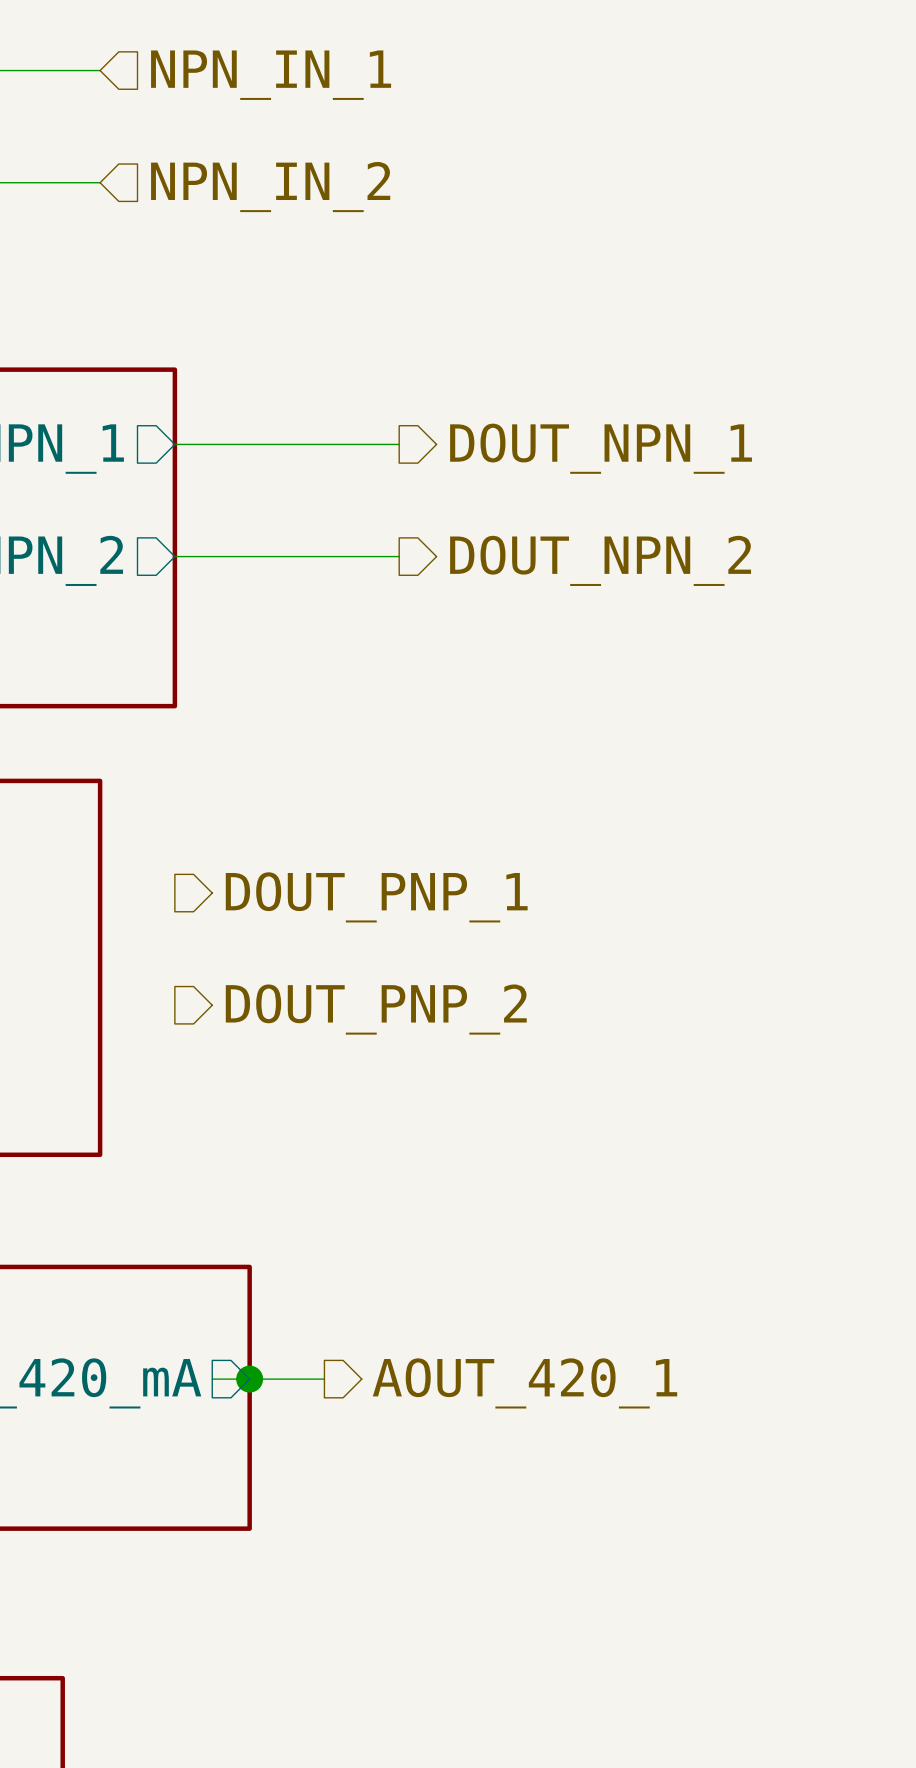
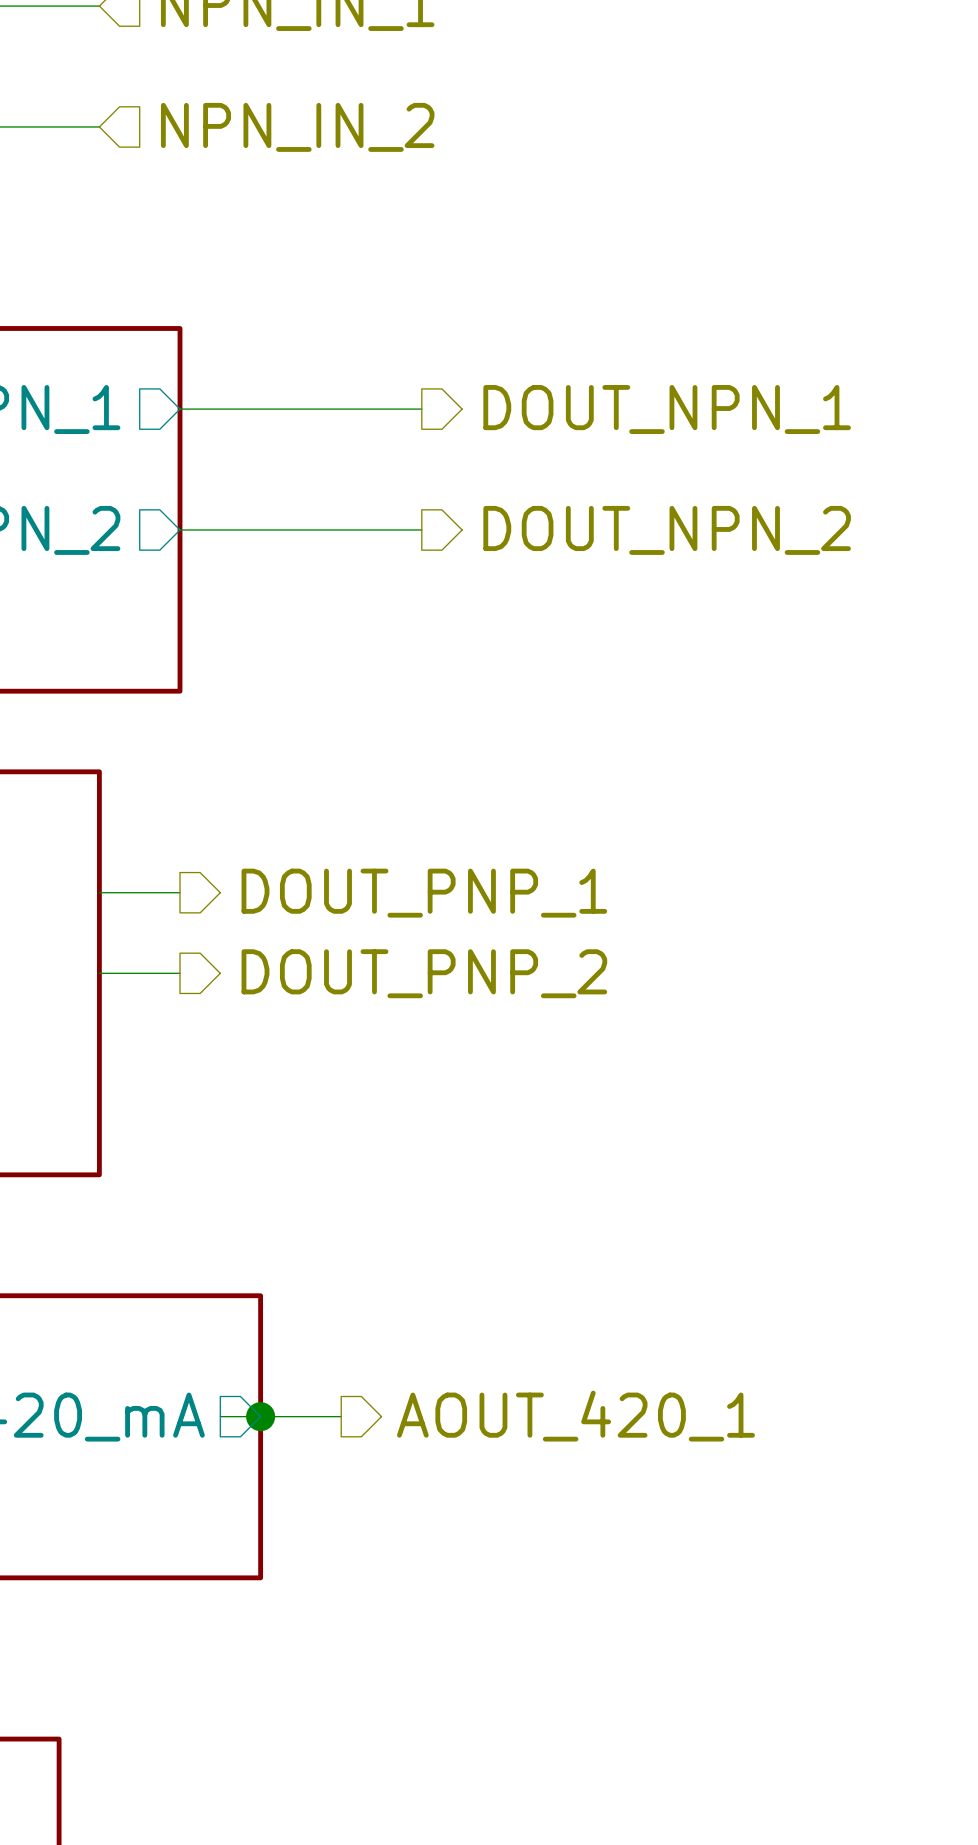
wire: none -> (99, 892) (180, 892)
wire: none -> (99, 973) (180, 973)
hierarchical label position: DOUT_PNP_2 (376, 1009) -> DOUT_PNP_2 (424, 973)

